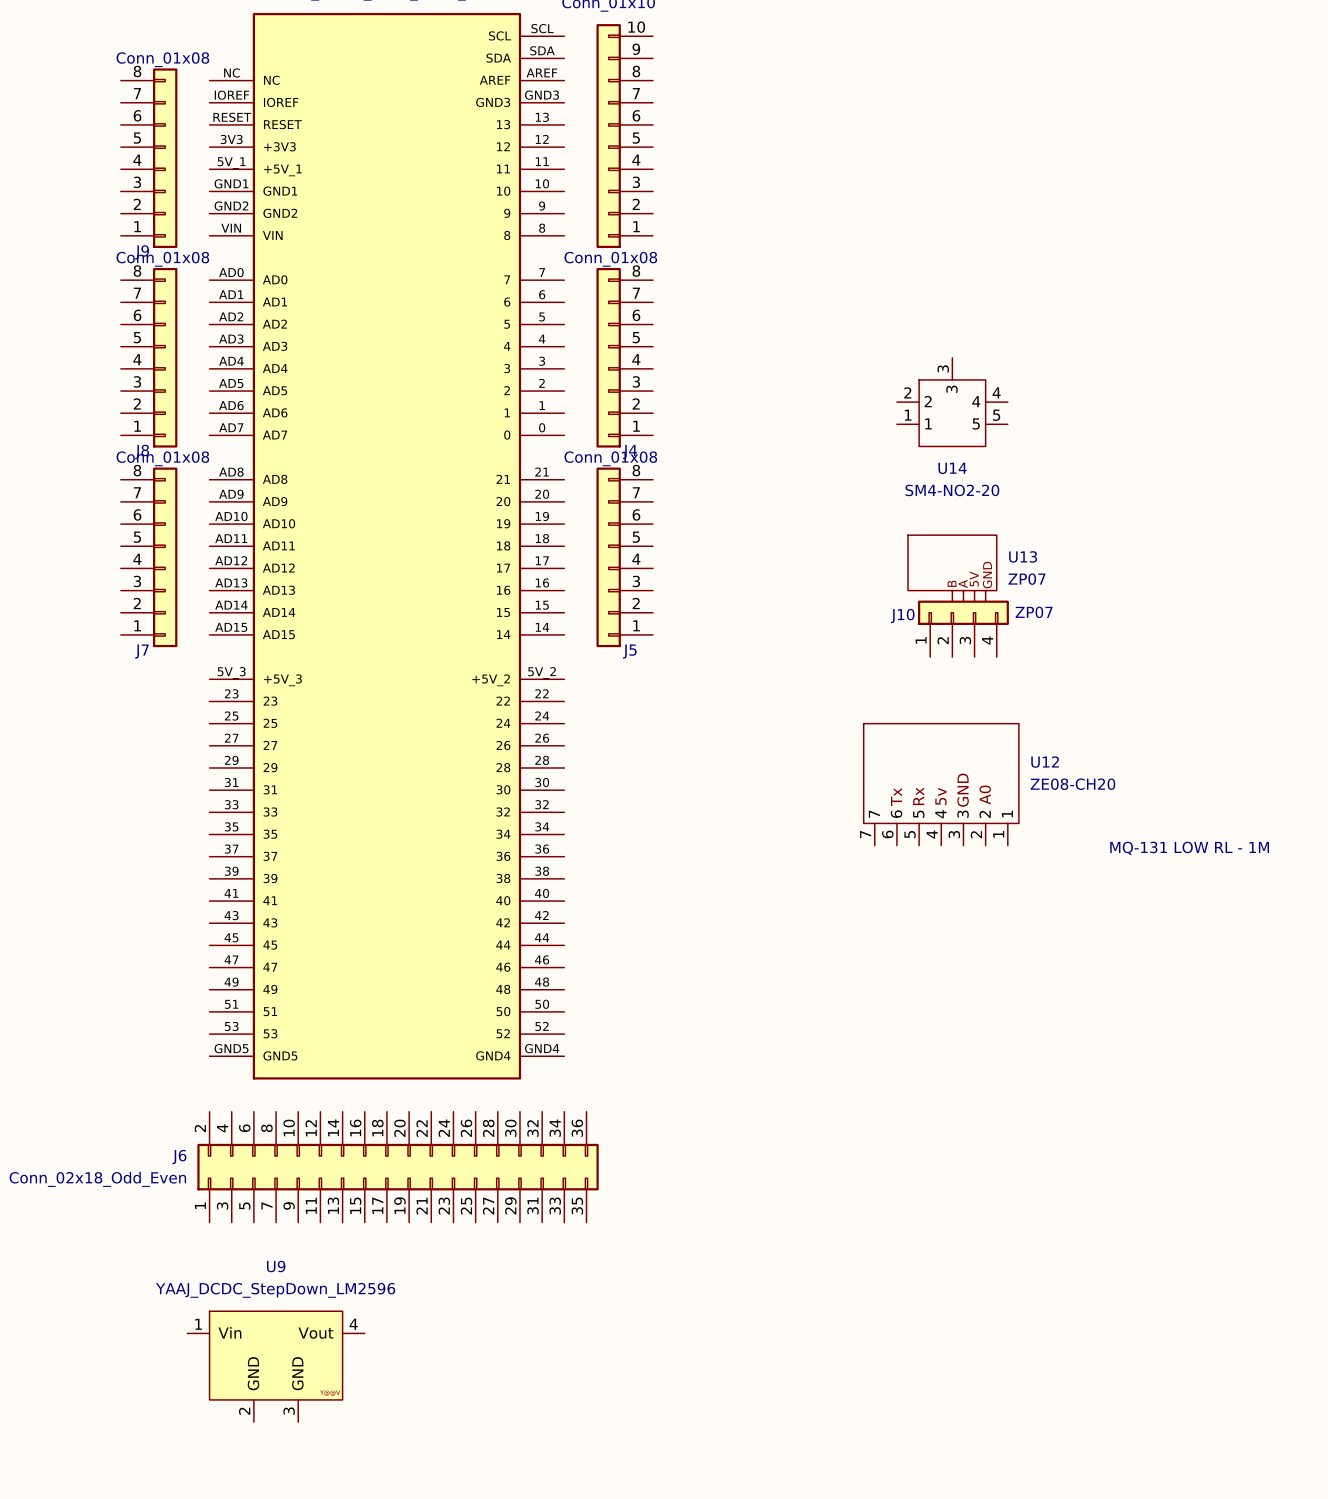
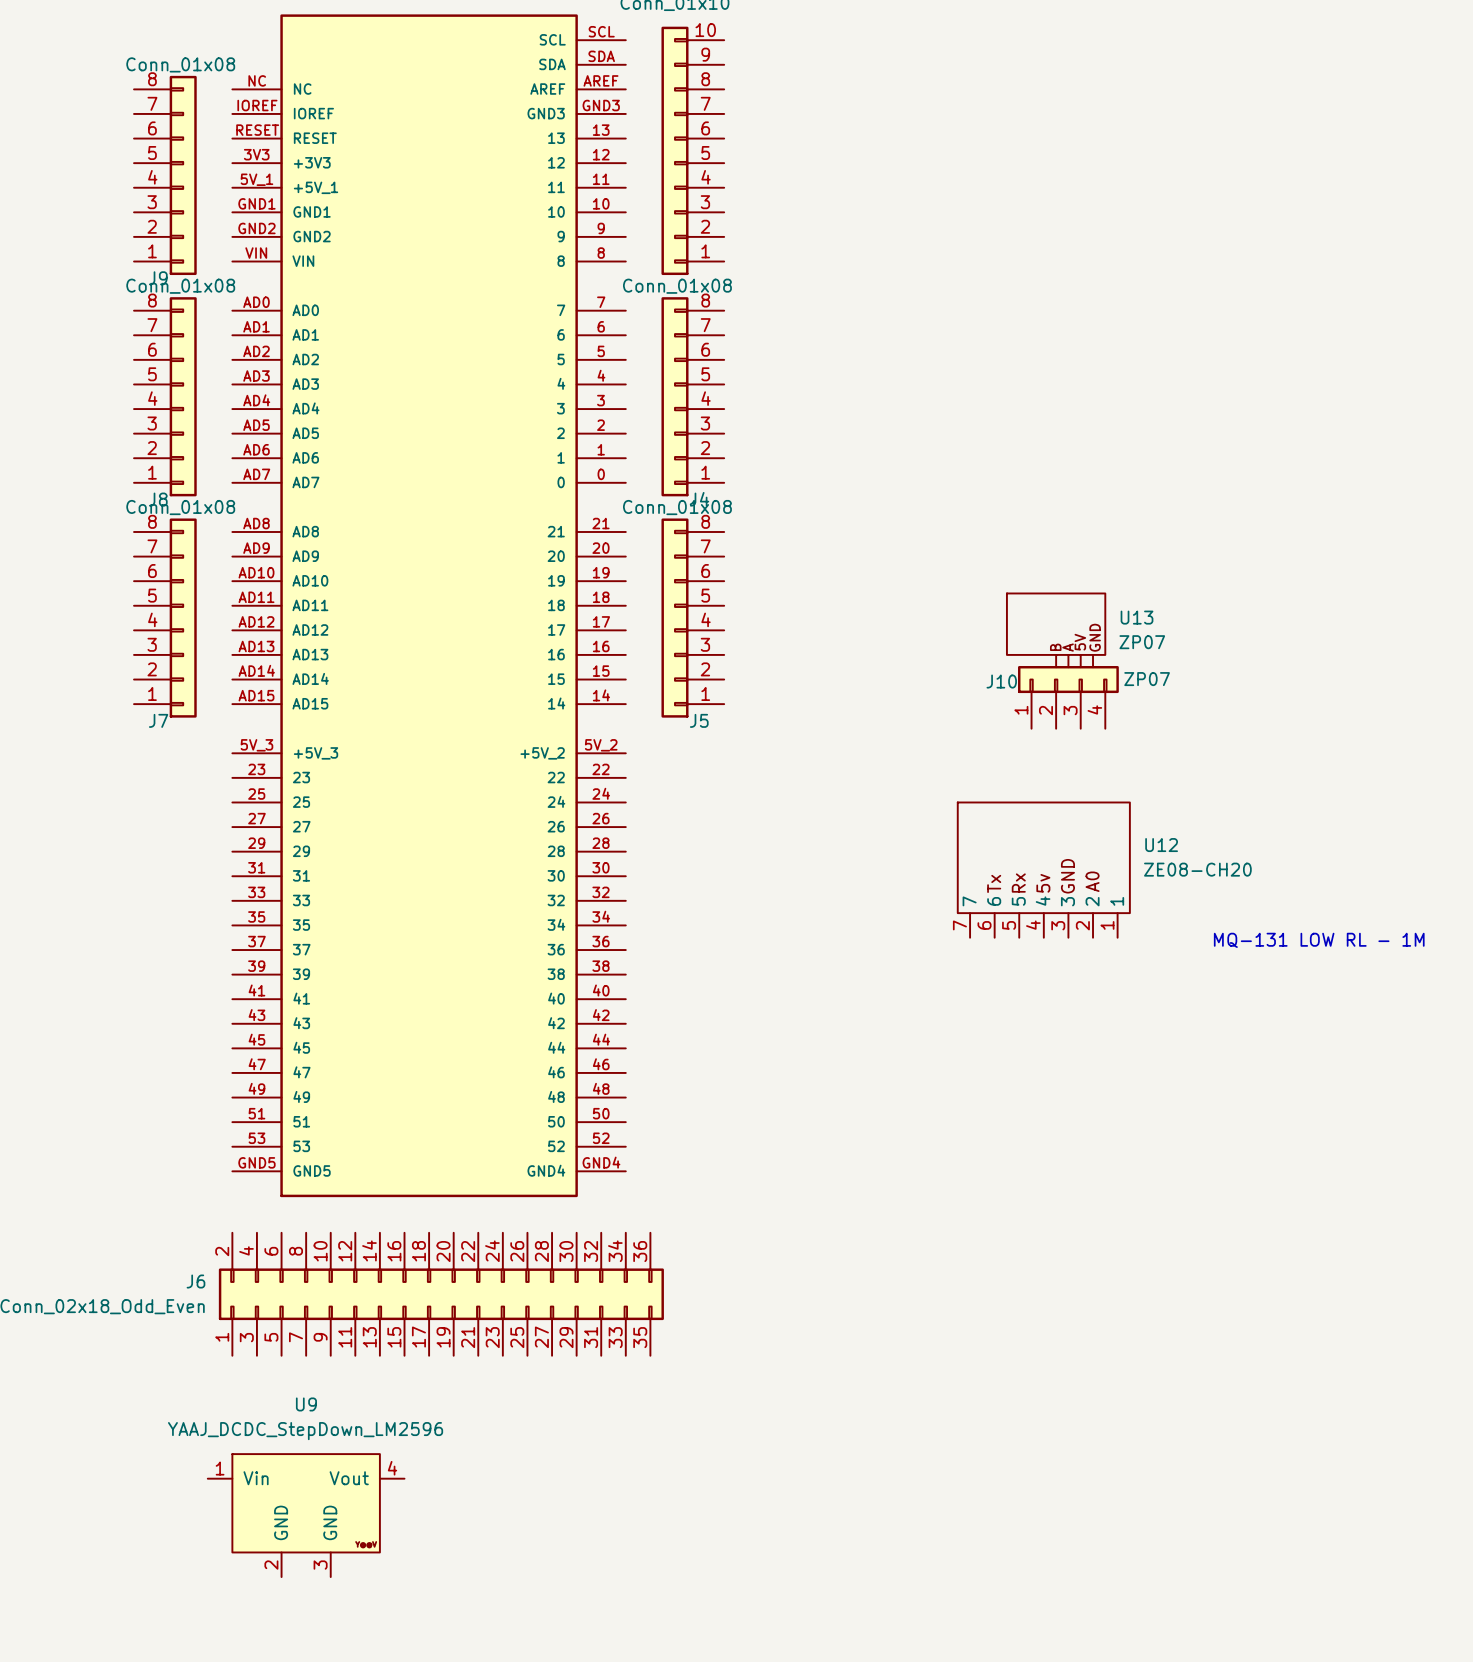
U14: SM4-NO2-20 (952, 402) -> none

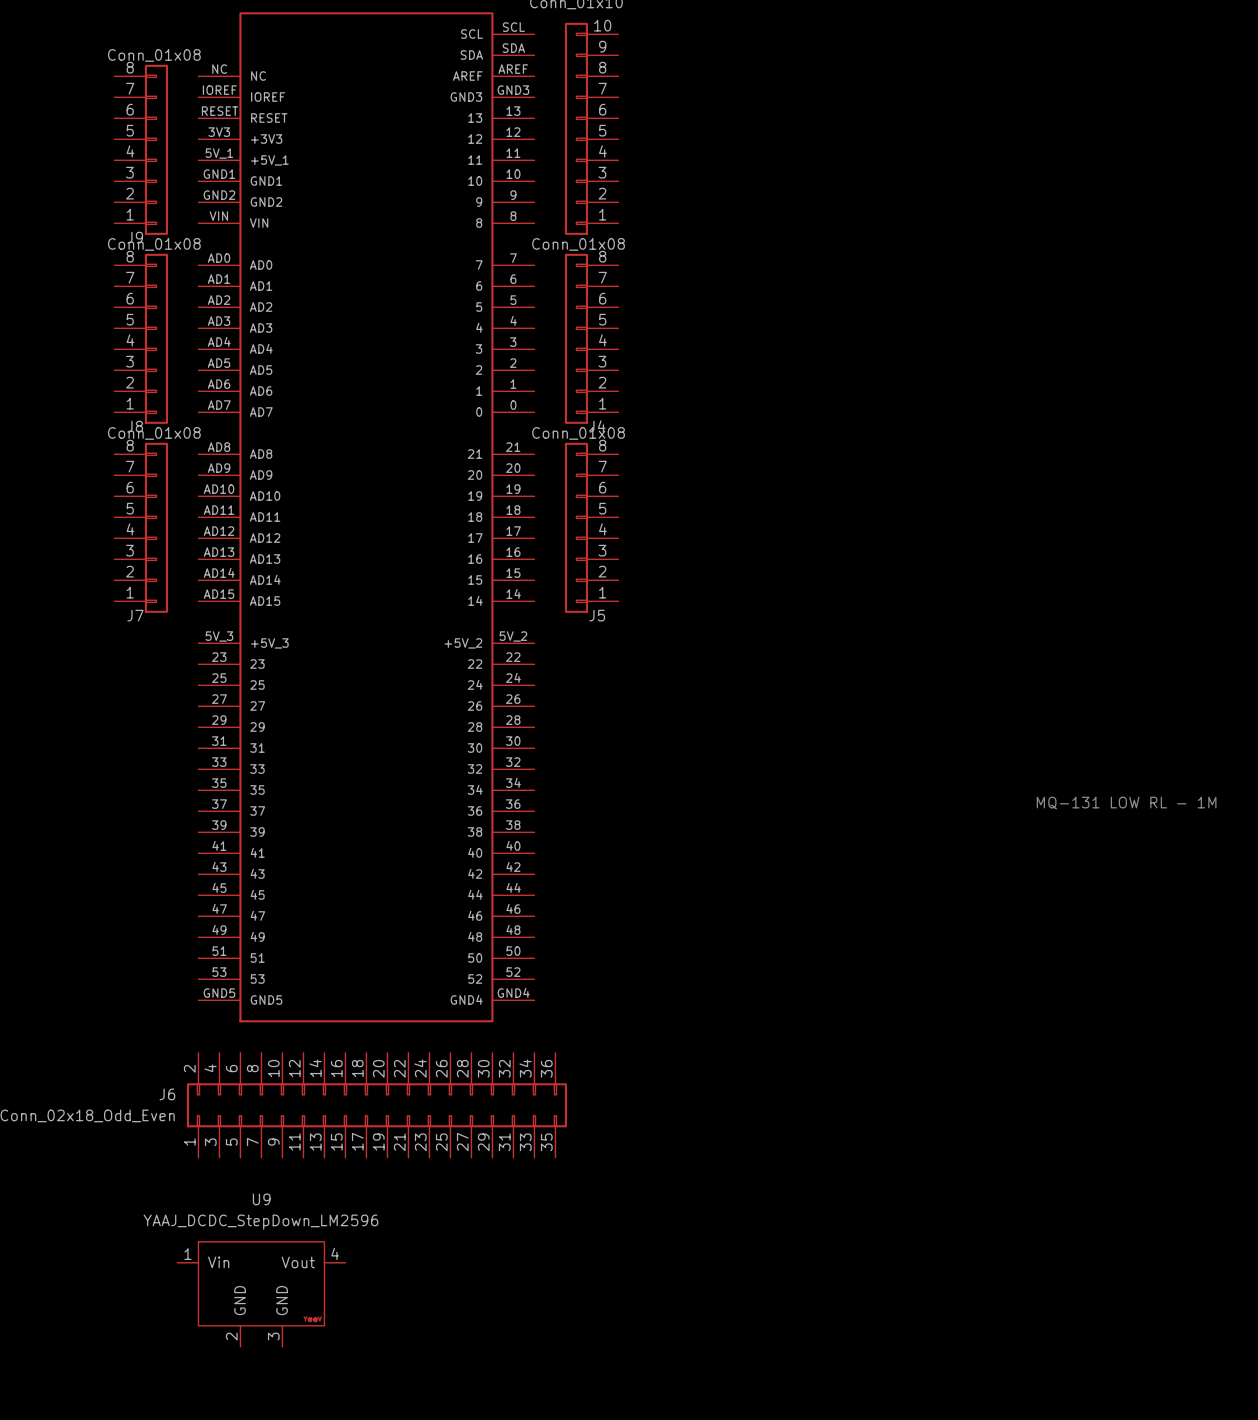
U13: ZP07 (1056, 630) -> none
J10: ZP07 (1068, 697) -> none
U12: ZE08-CH20 (1043, 870) -> none

